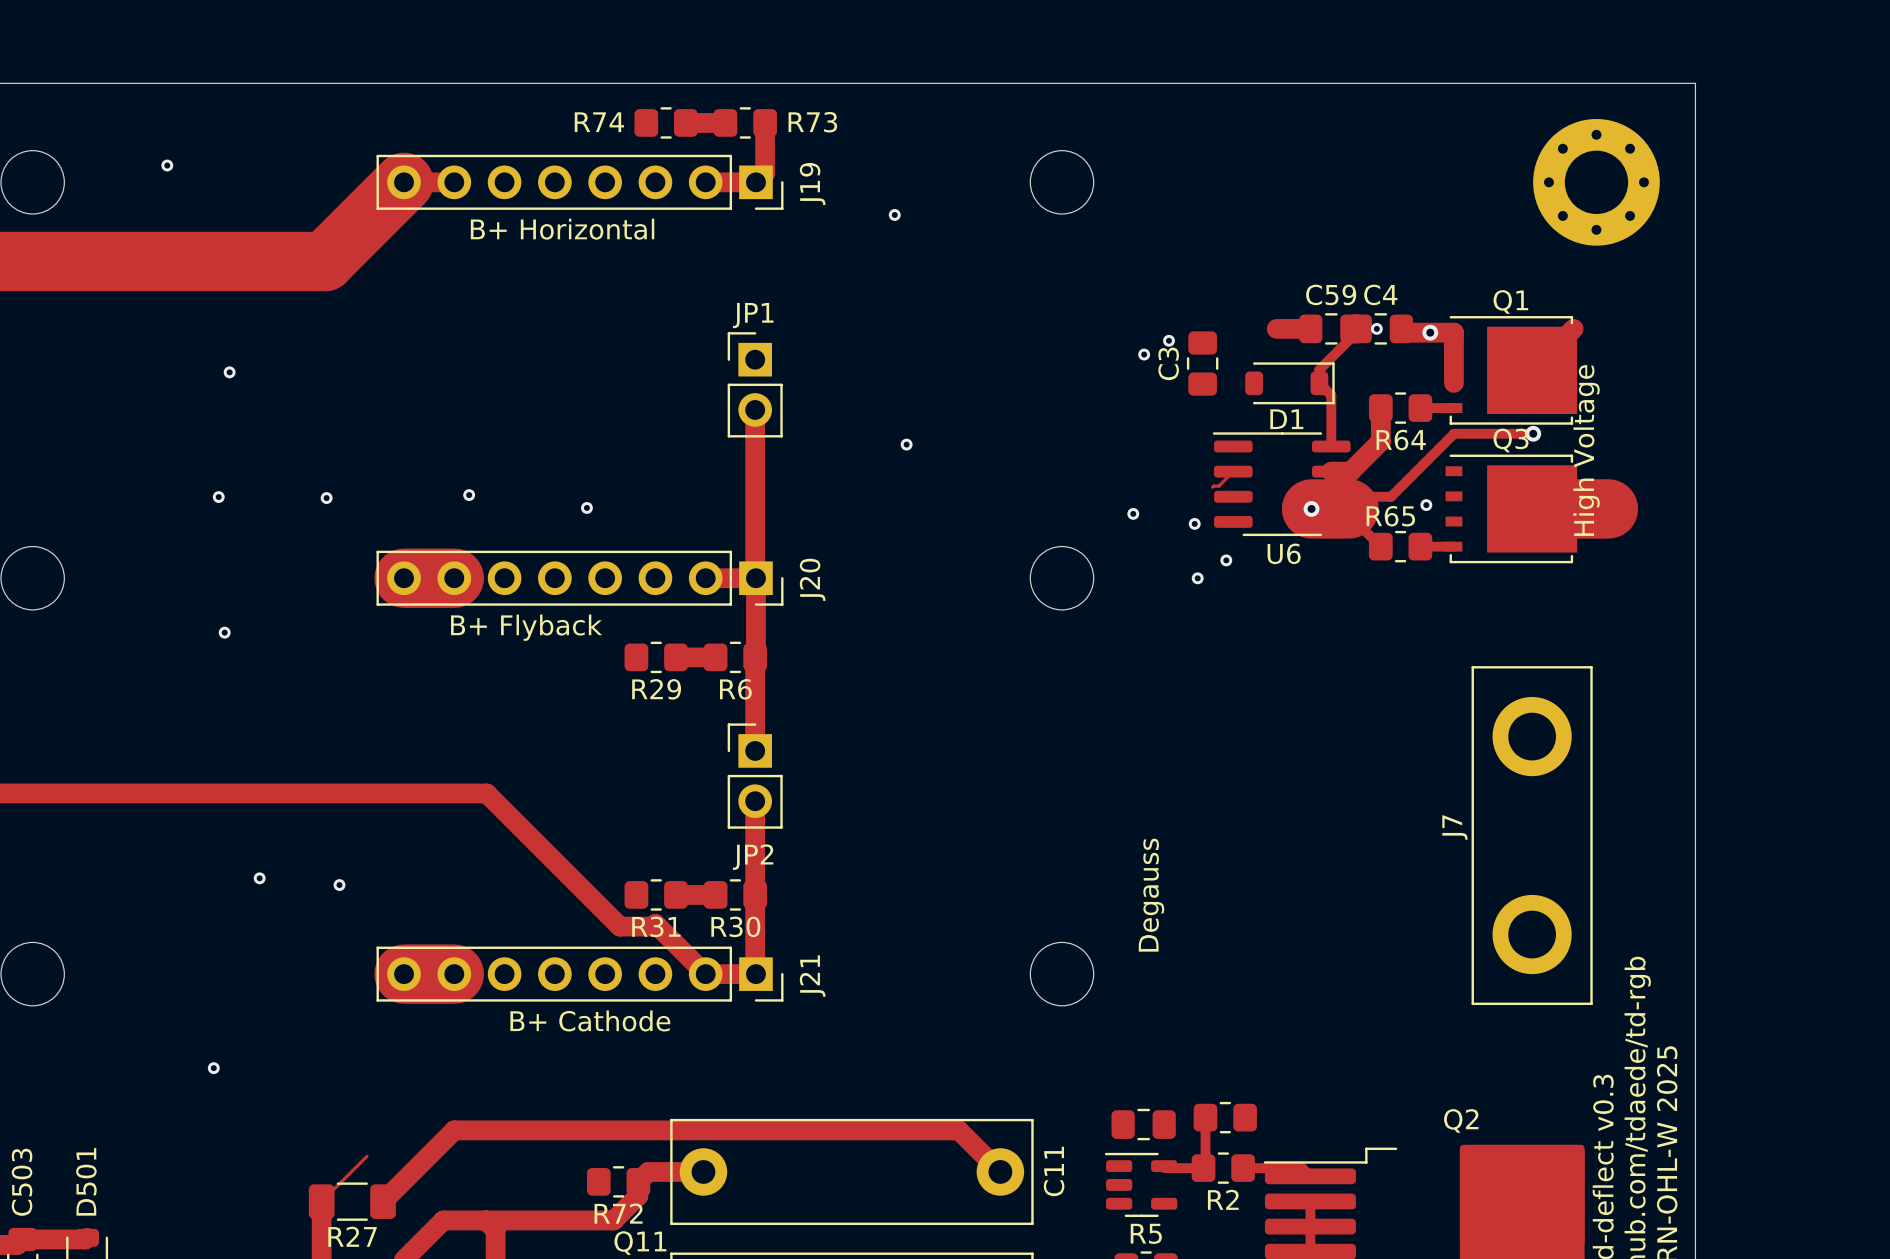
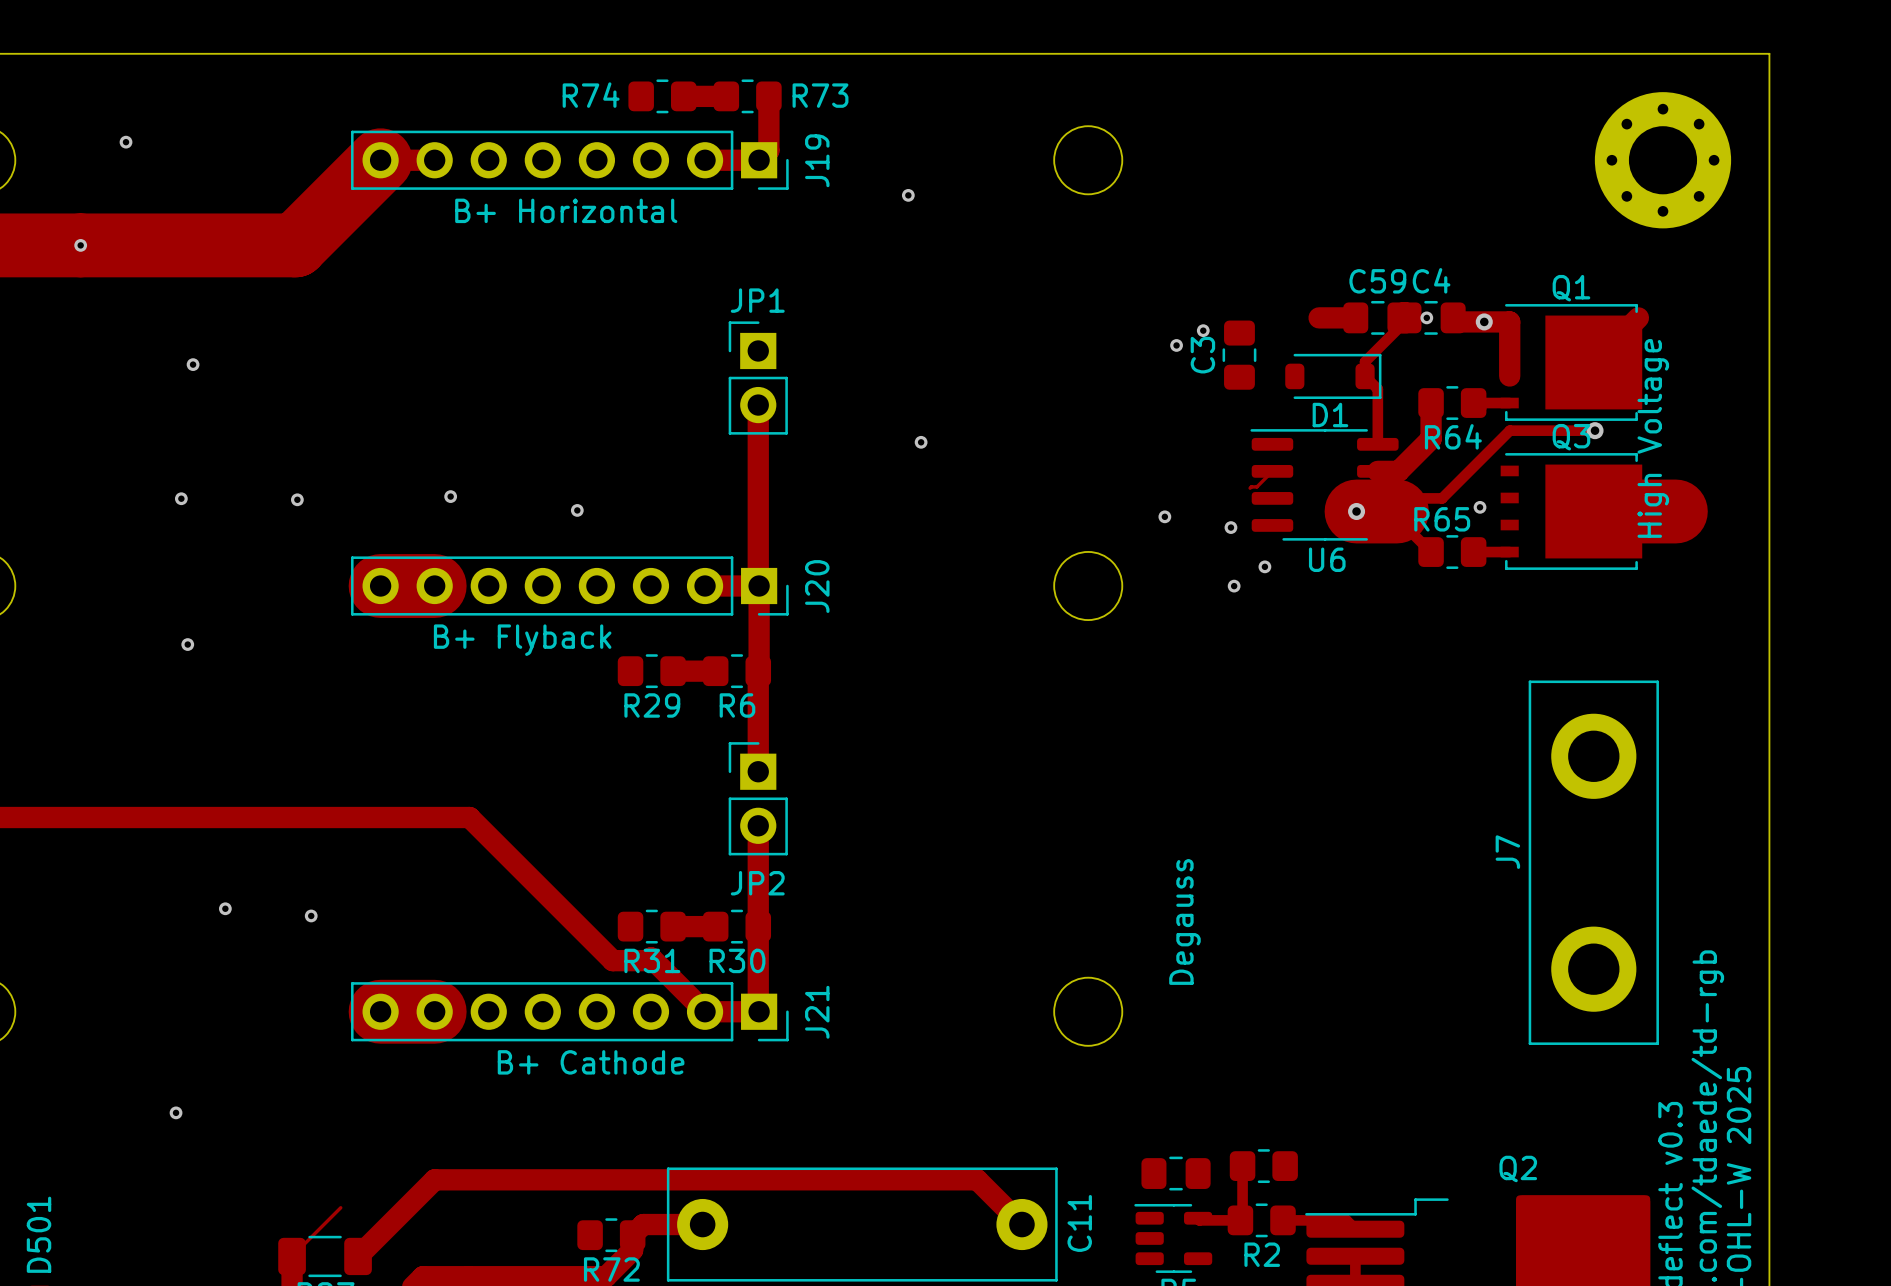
via: none -> (80, 245)

